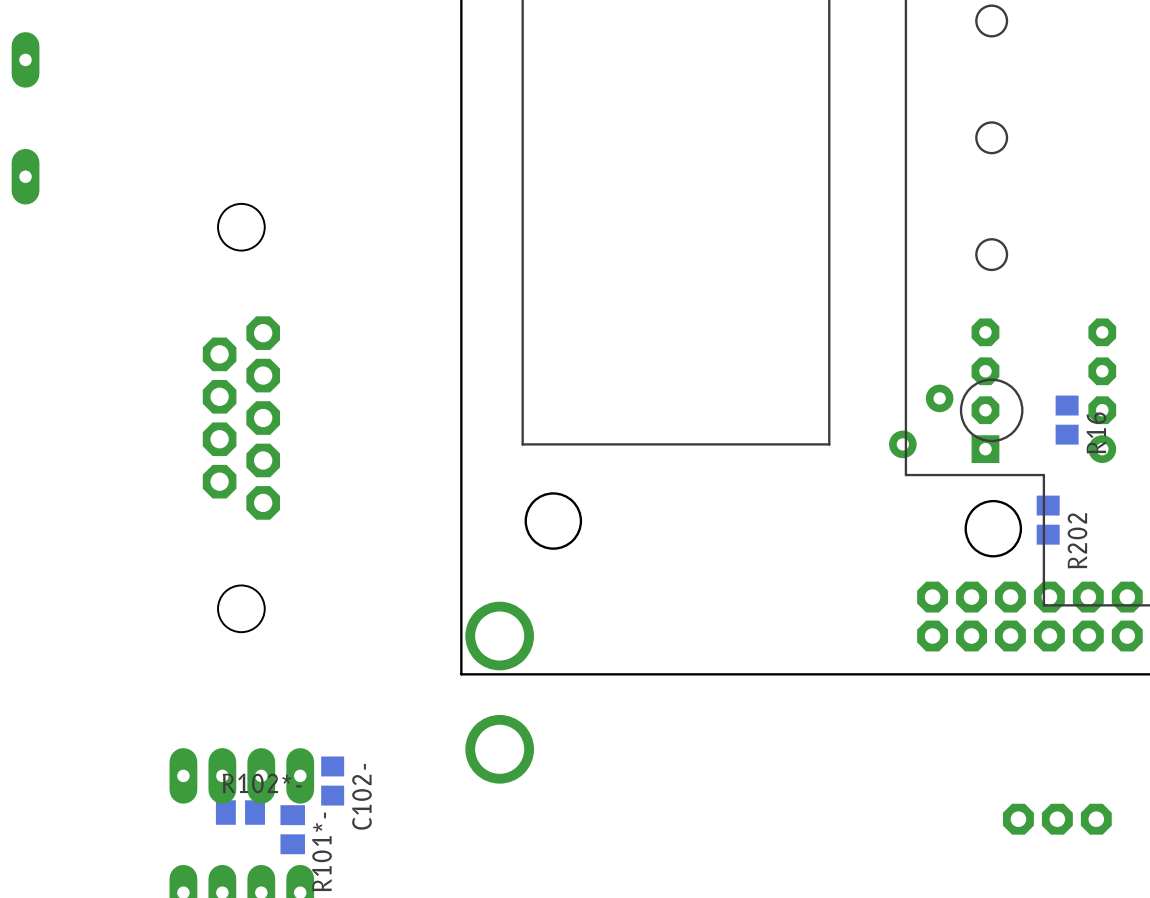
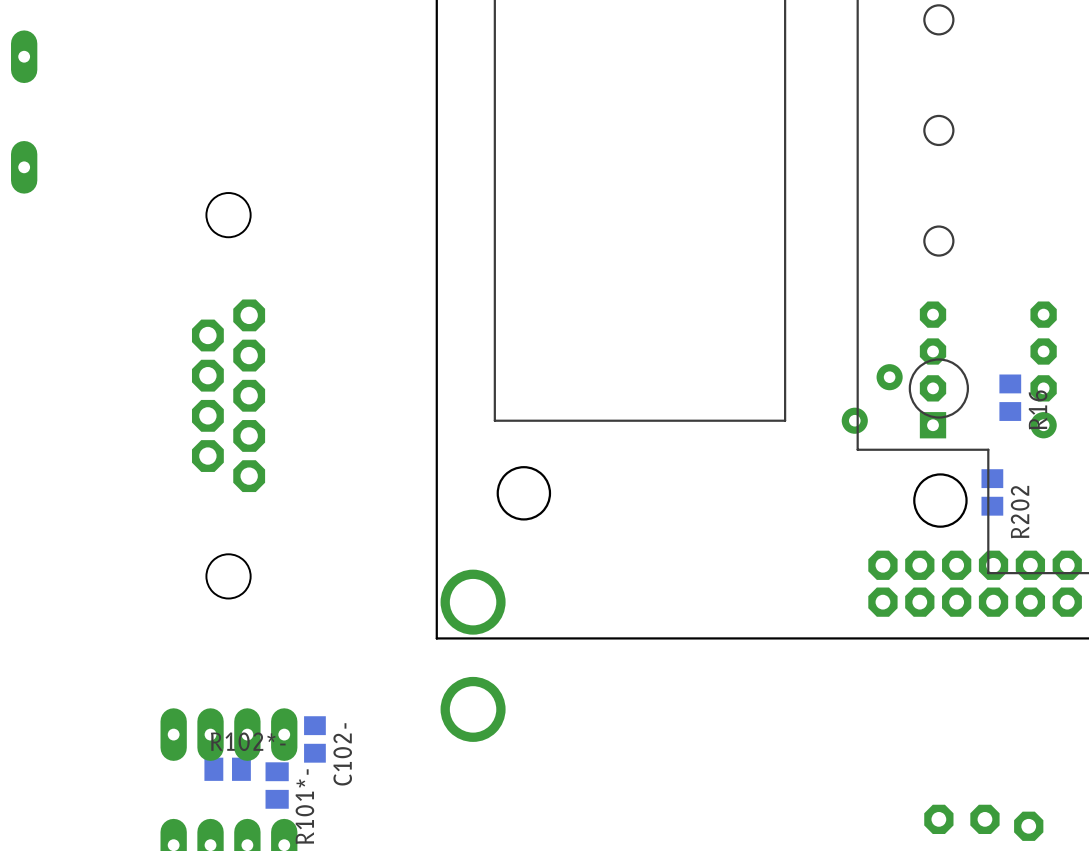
part: (1018, 819) -> none
part: (1057, 819) -> none
part: (1096, 819) -> none
part: none -> (938, 819)
part: none -> (984, 819)
part: none -> (1028, 826)

